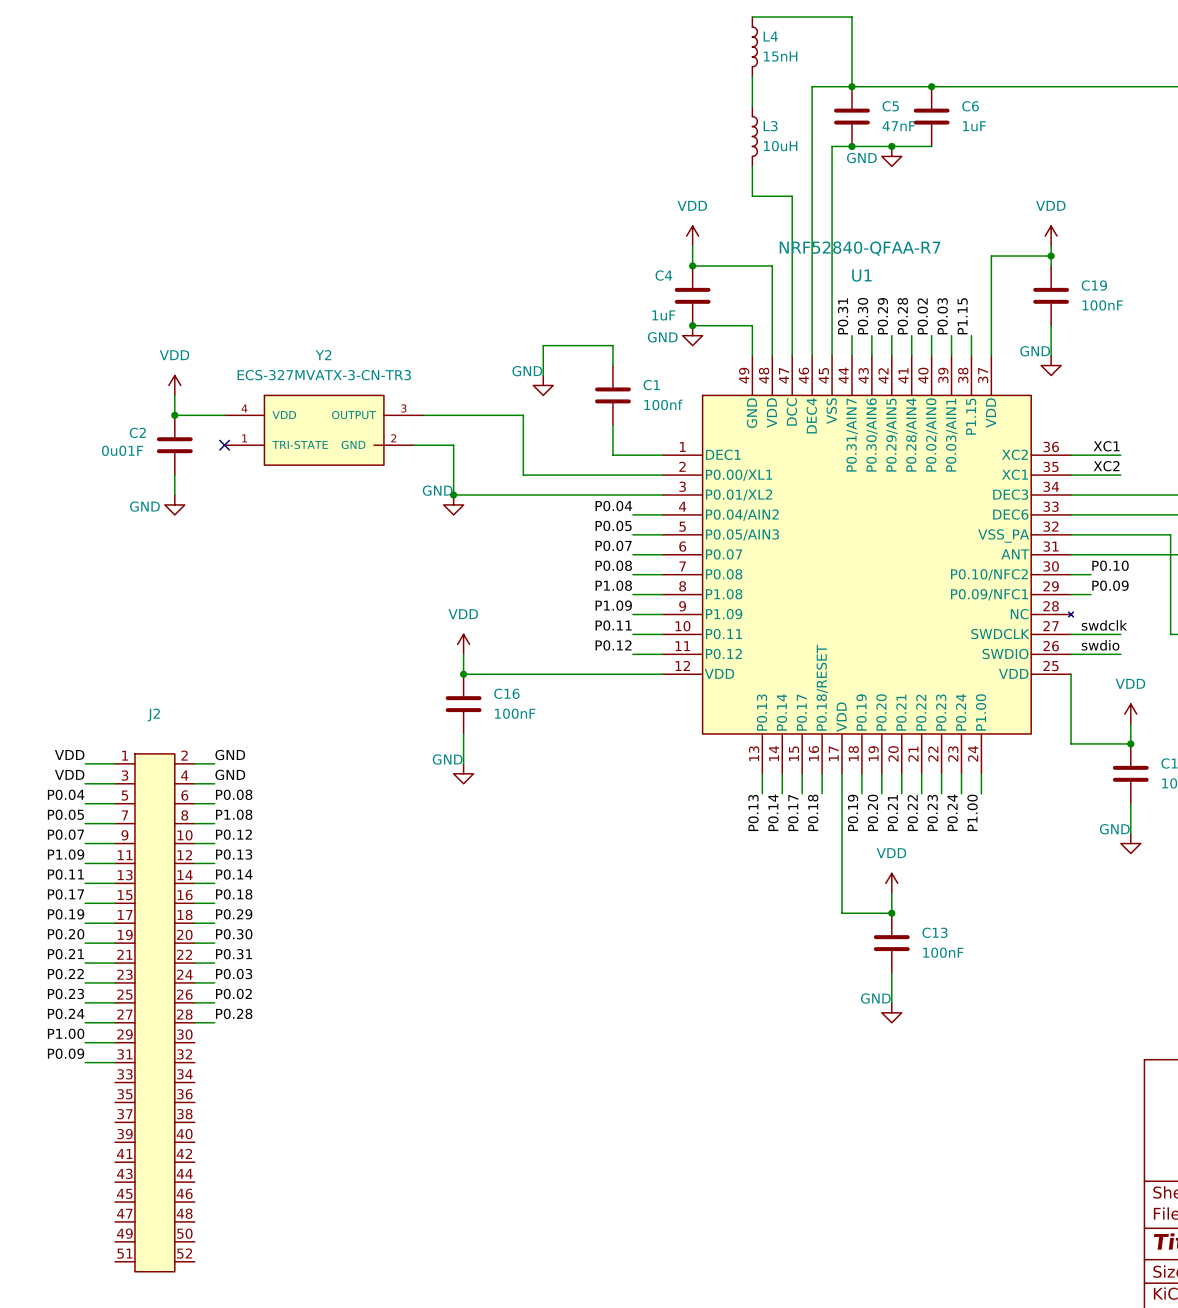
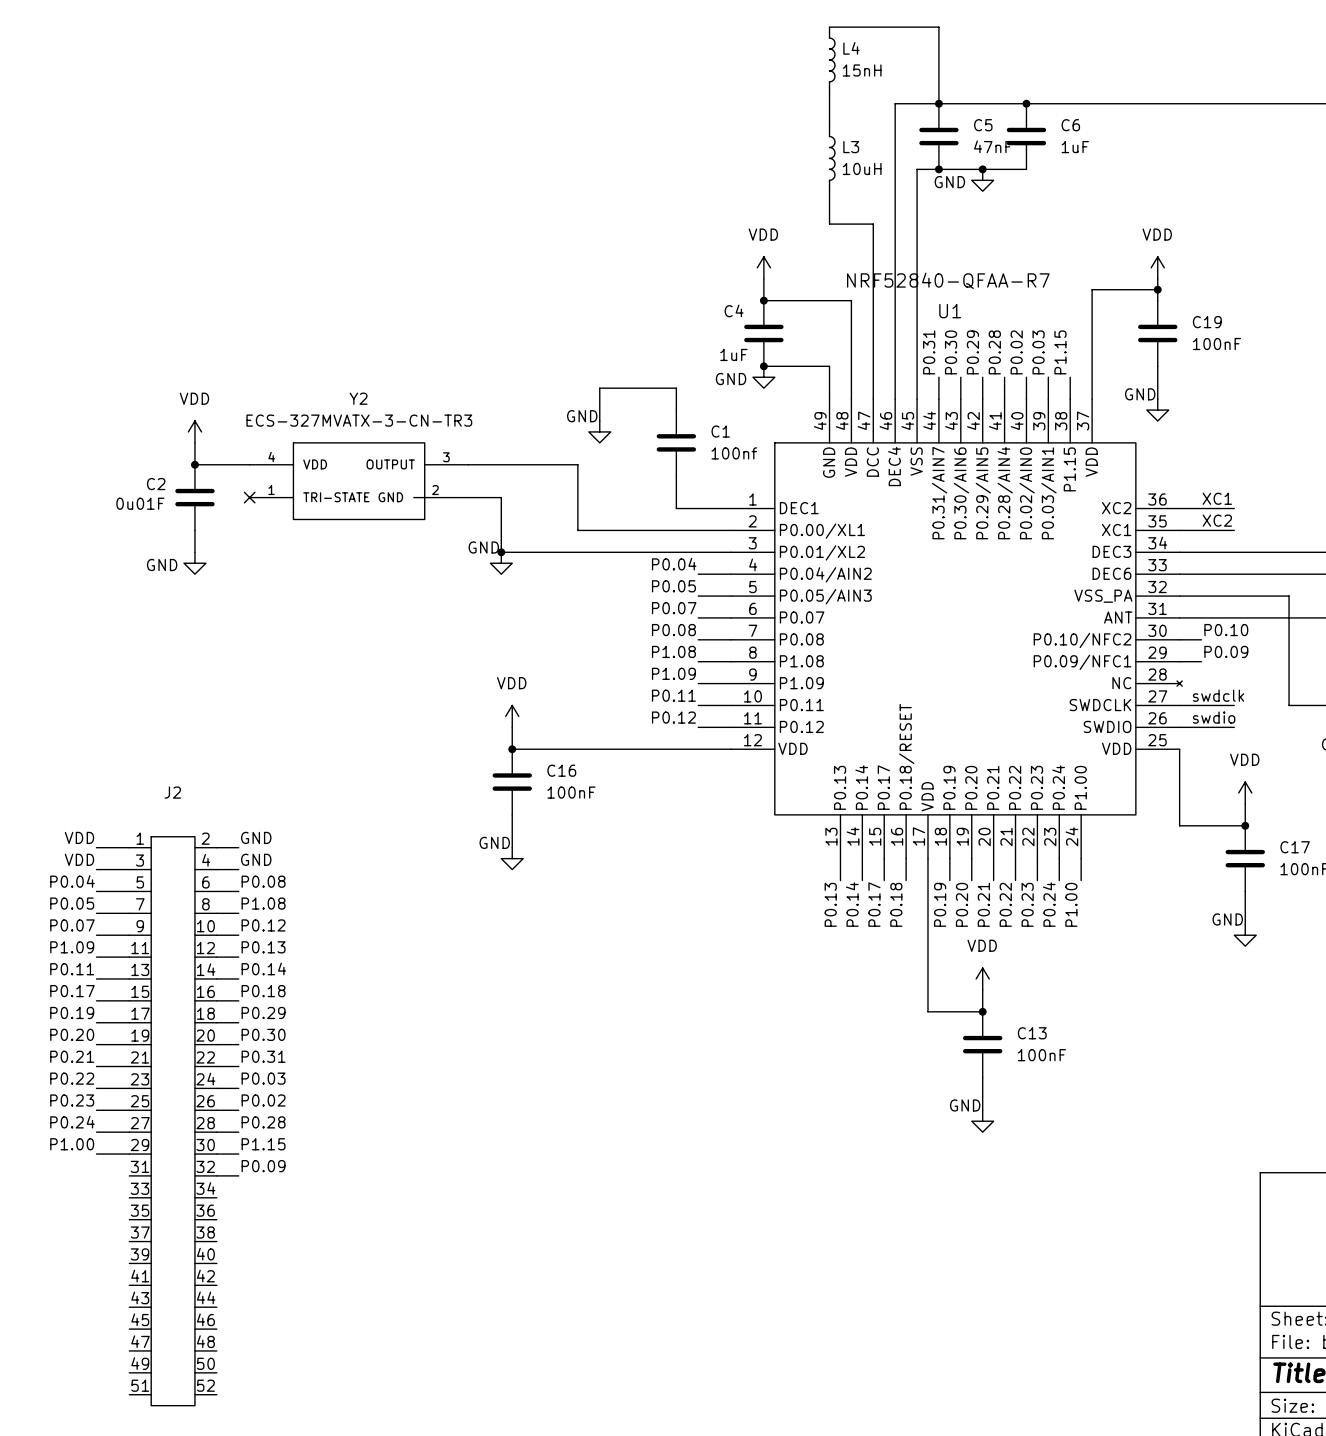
label: none -> P1.15 (263, 1144)
wire: none -> (216, 1154) (238, 1154)
label position: P0.09 (66, 1053) -> P0.09 (263, 1166)
wire: (85, 1062) (115, 1062) -> none
wire: none -> (216, 1175) (238, 1175)

